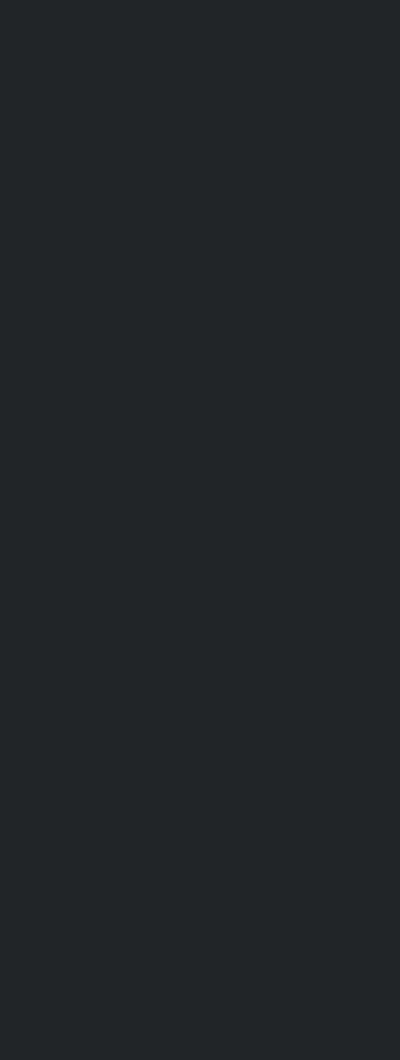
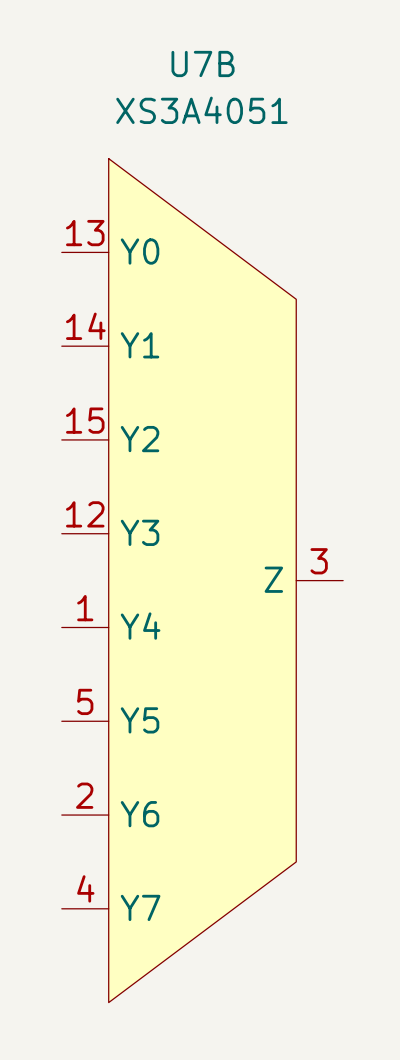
U7B: none -> XS3A4051 (202, 580)

